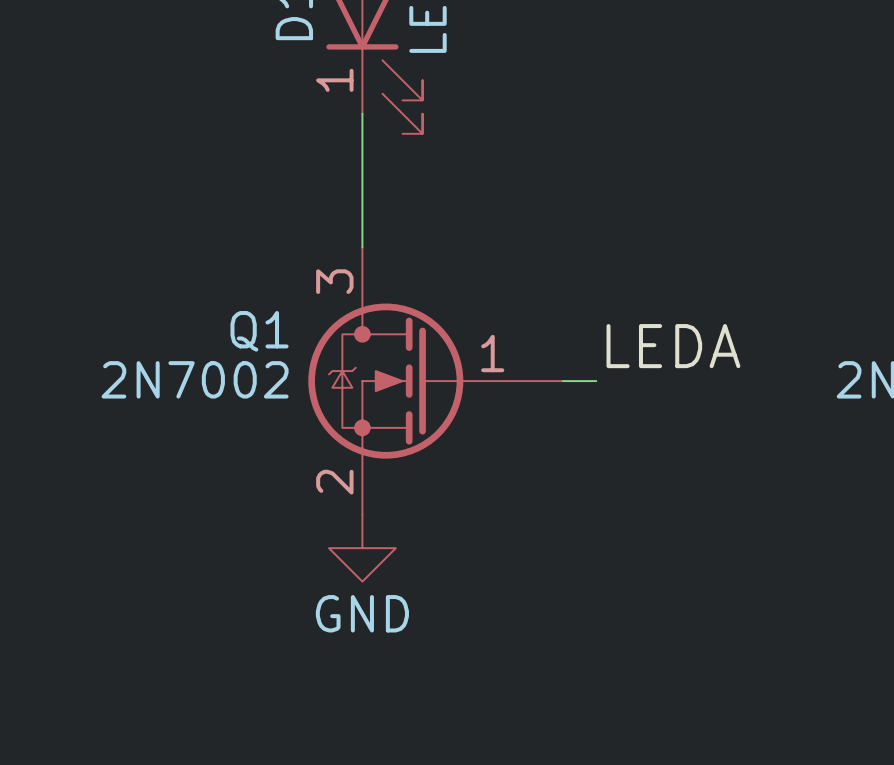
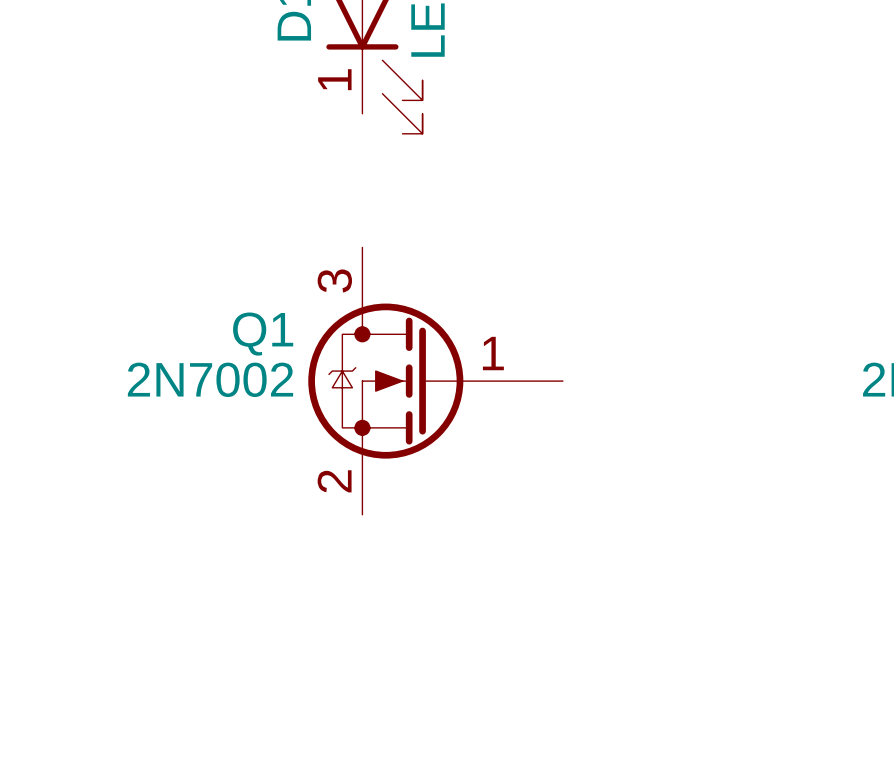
wire: (362, 113) (362, 247) -> none
label: LEDA (673, 346) -> none
wire: (562, 381) (596, 381) -> none
power symbol: GND (362, 548) -> none

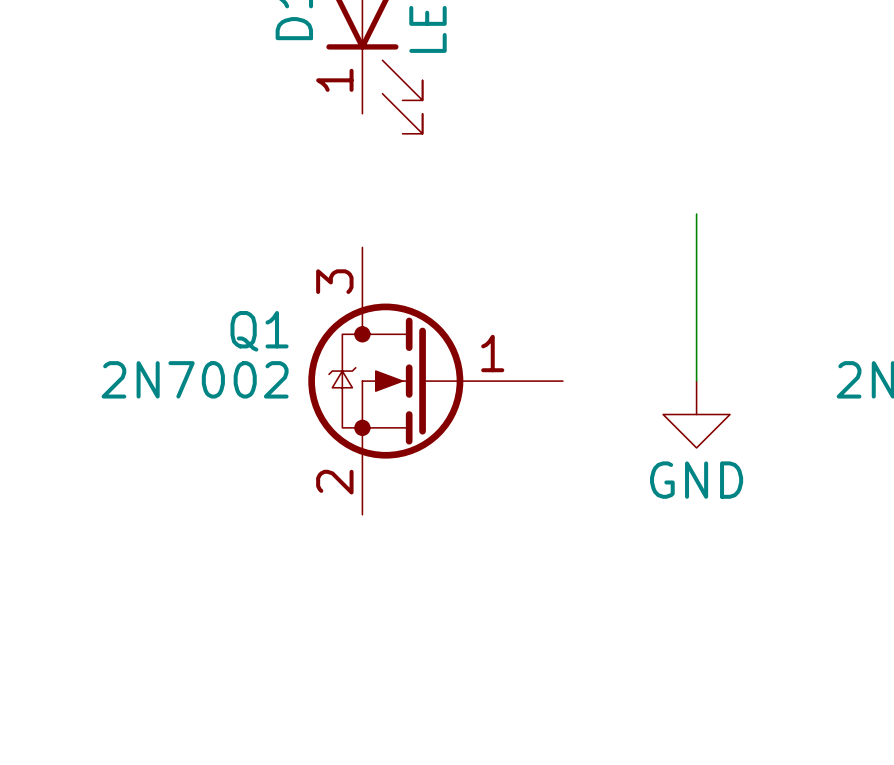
wire: none -> (696, 214) (696, 381)
power symbol: none -> GND (696, 414)

